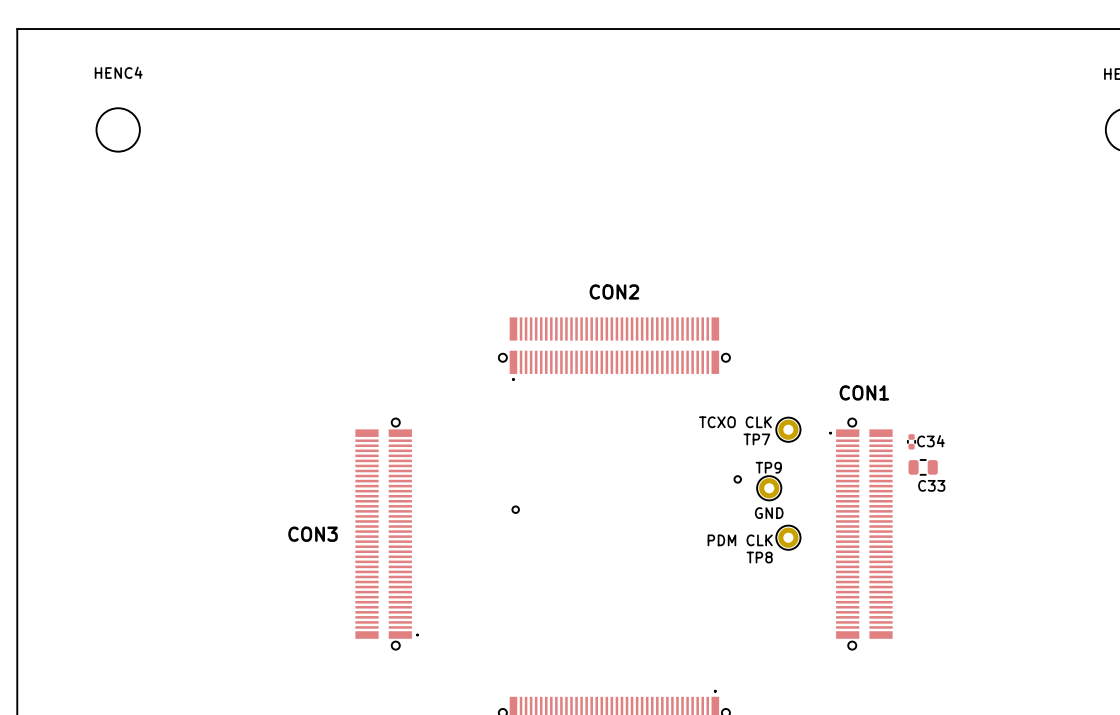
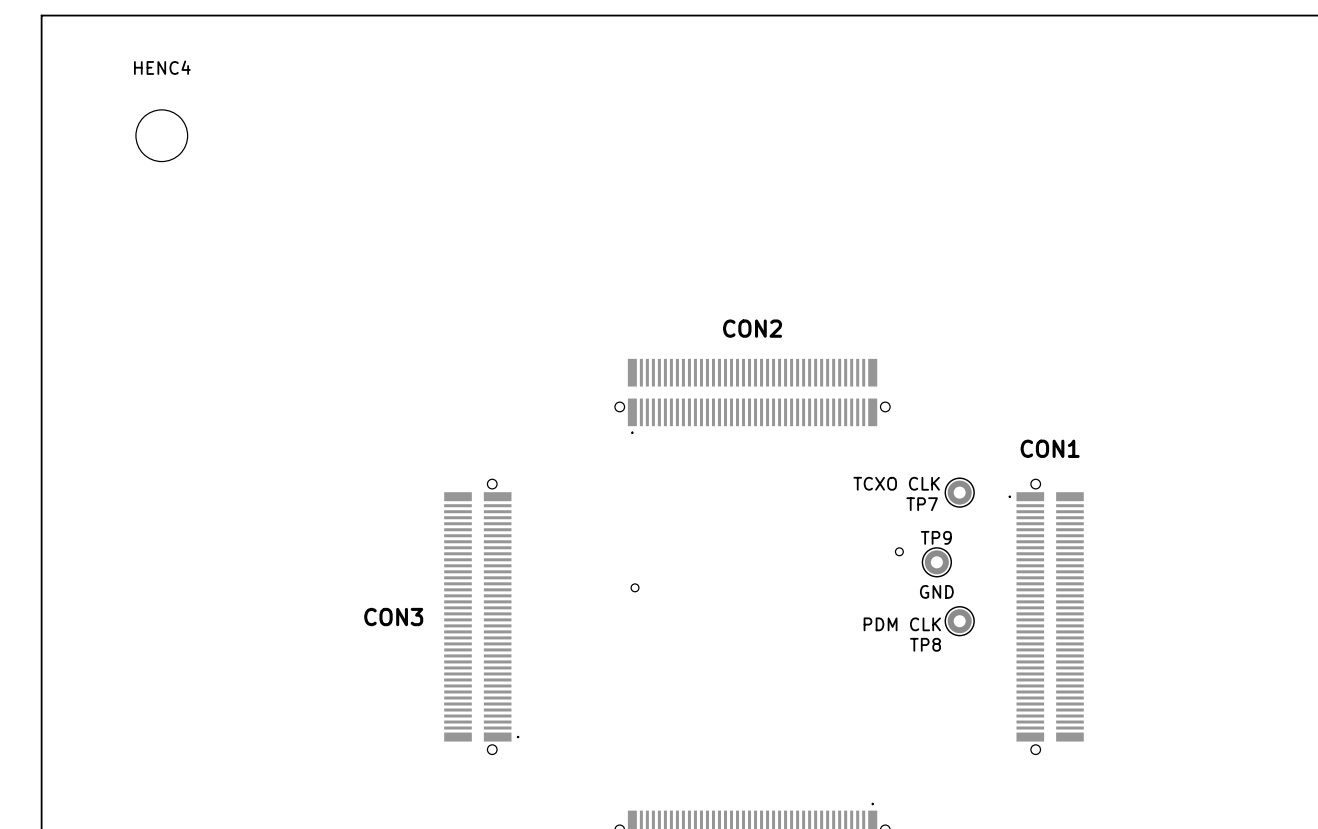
C34: (911, 441) -> none
C33: (923, 467) -> none

